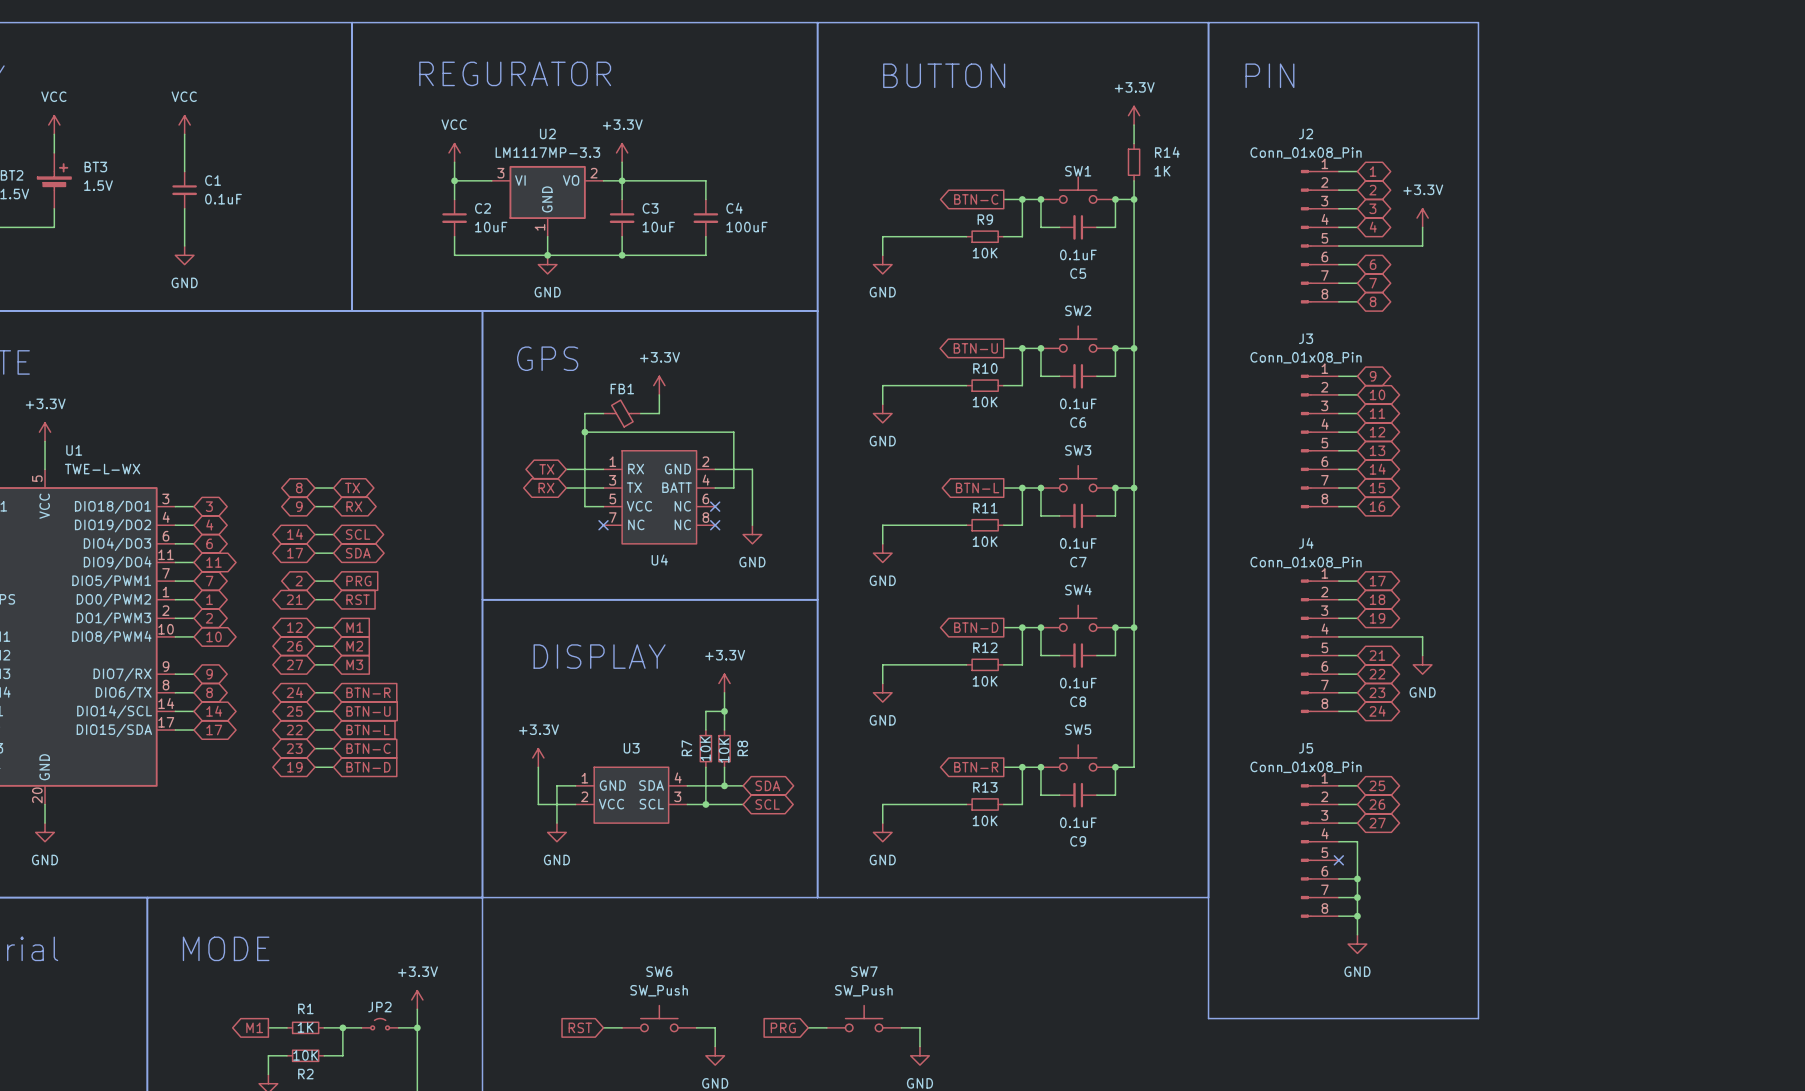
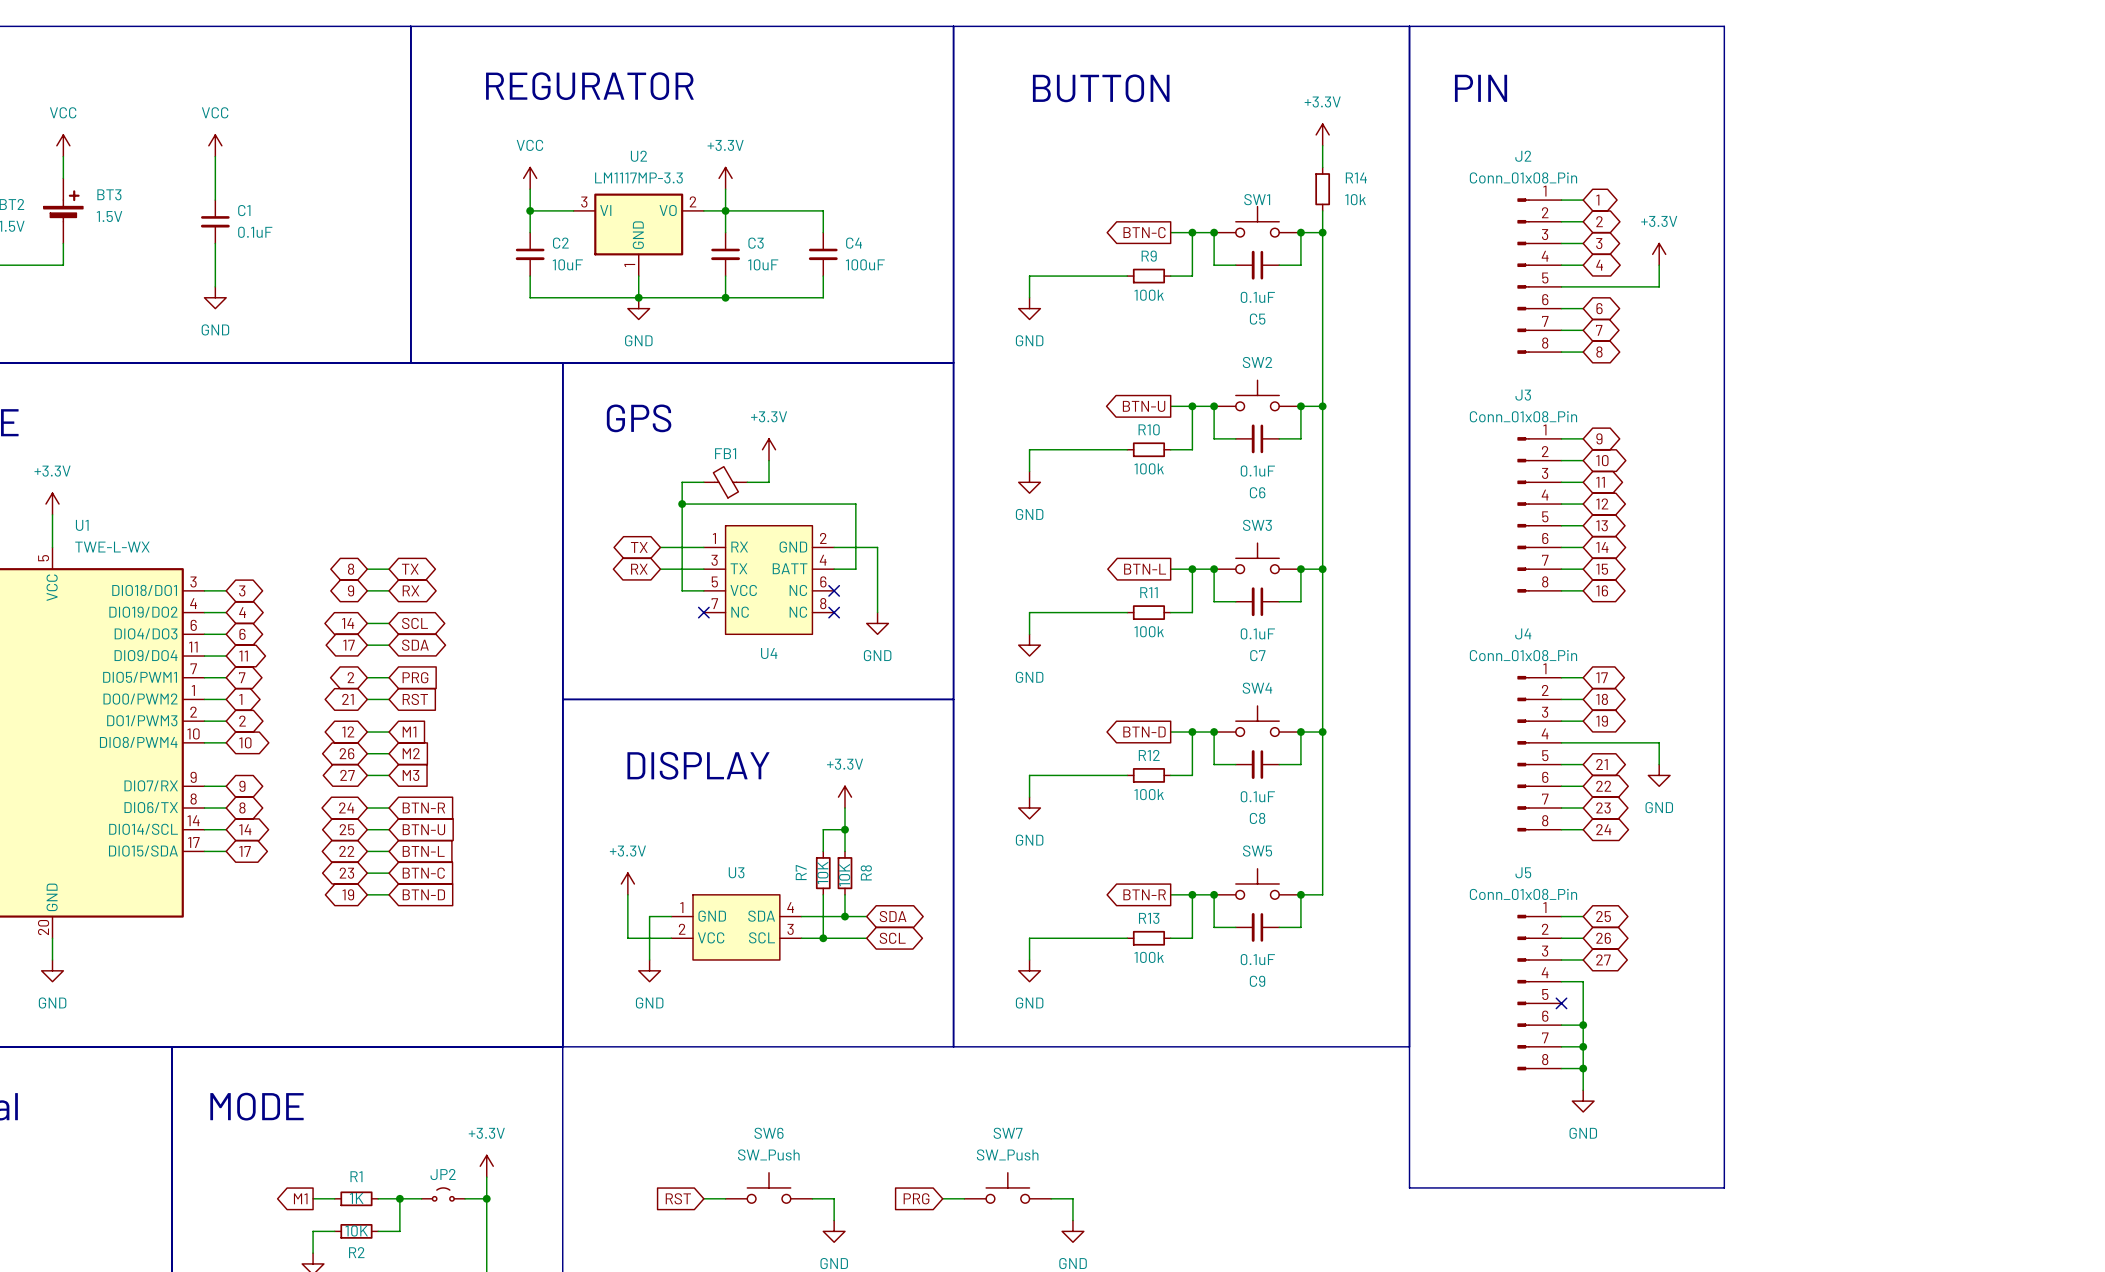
R14 value: 1K (1162, 171) -> 10k (1355, 199)
R9 value: 10K (985, 253) -> 100k (1149, 295)
R10 value: 10K (985, 402) -> 100k (1149, 468)
R11 value: 10K (985, 541) -> 100k (1149, 631)
R12 value: 10K (985, 681) -> 100k (1149, 794)
R13 value: 10K (985, 820) -> 100k (1149, 957)

